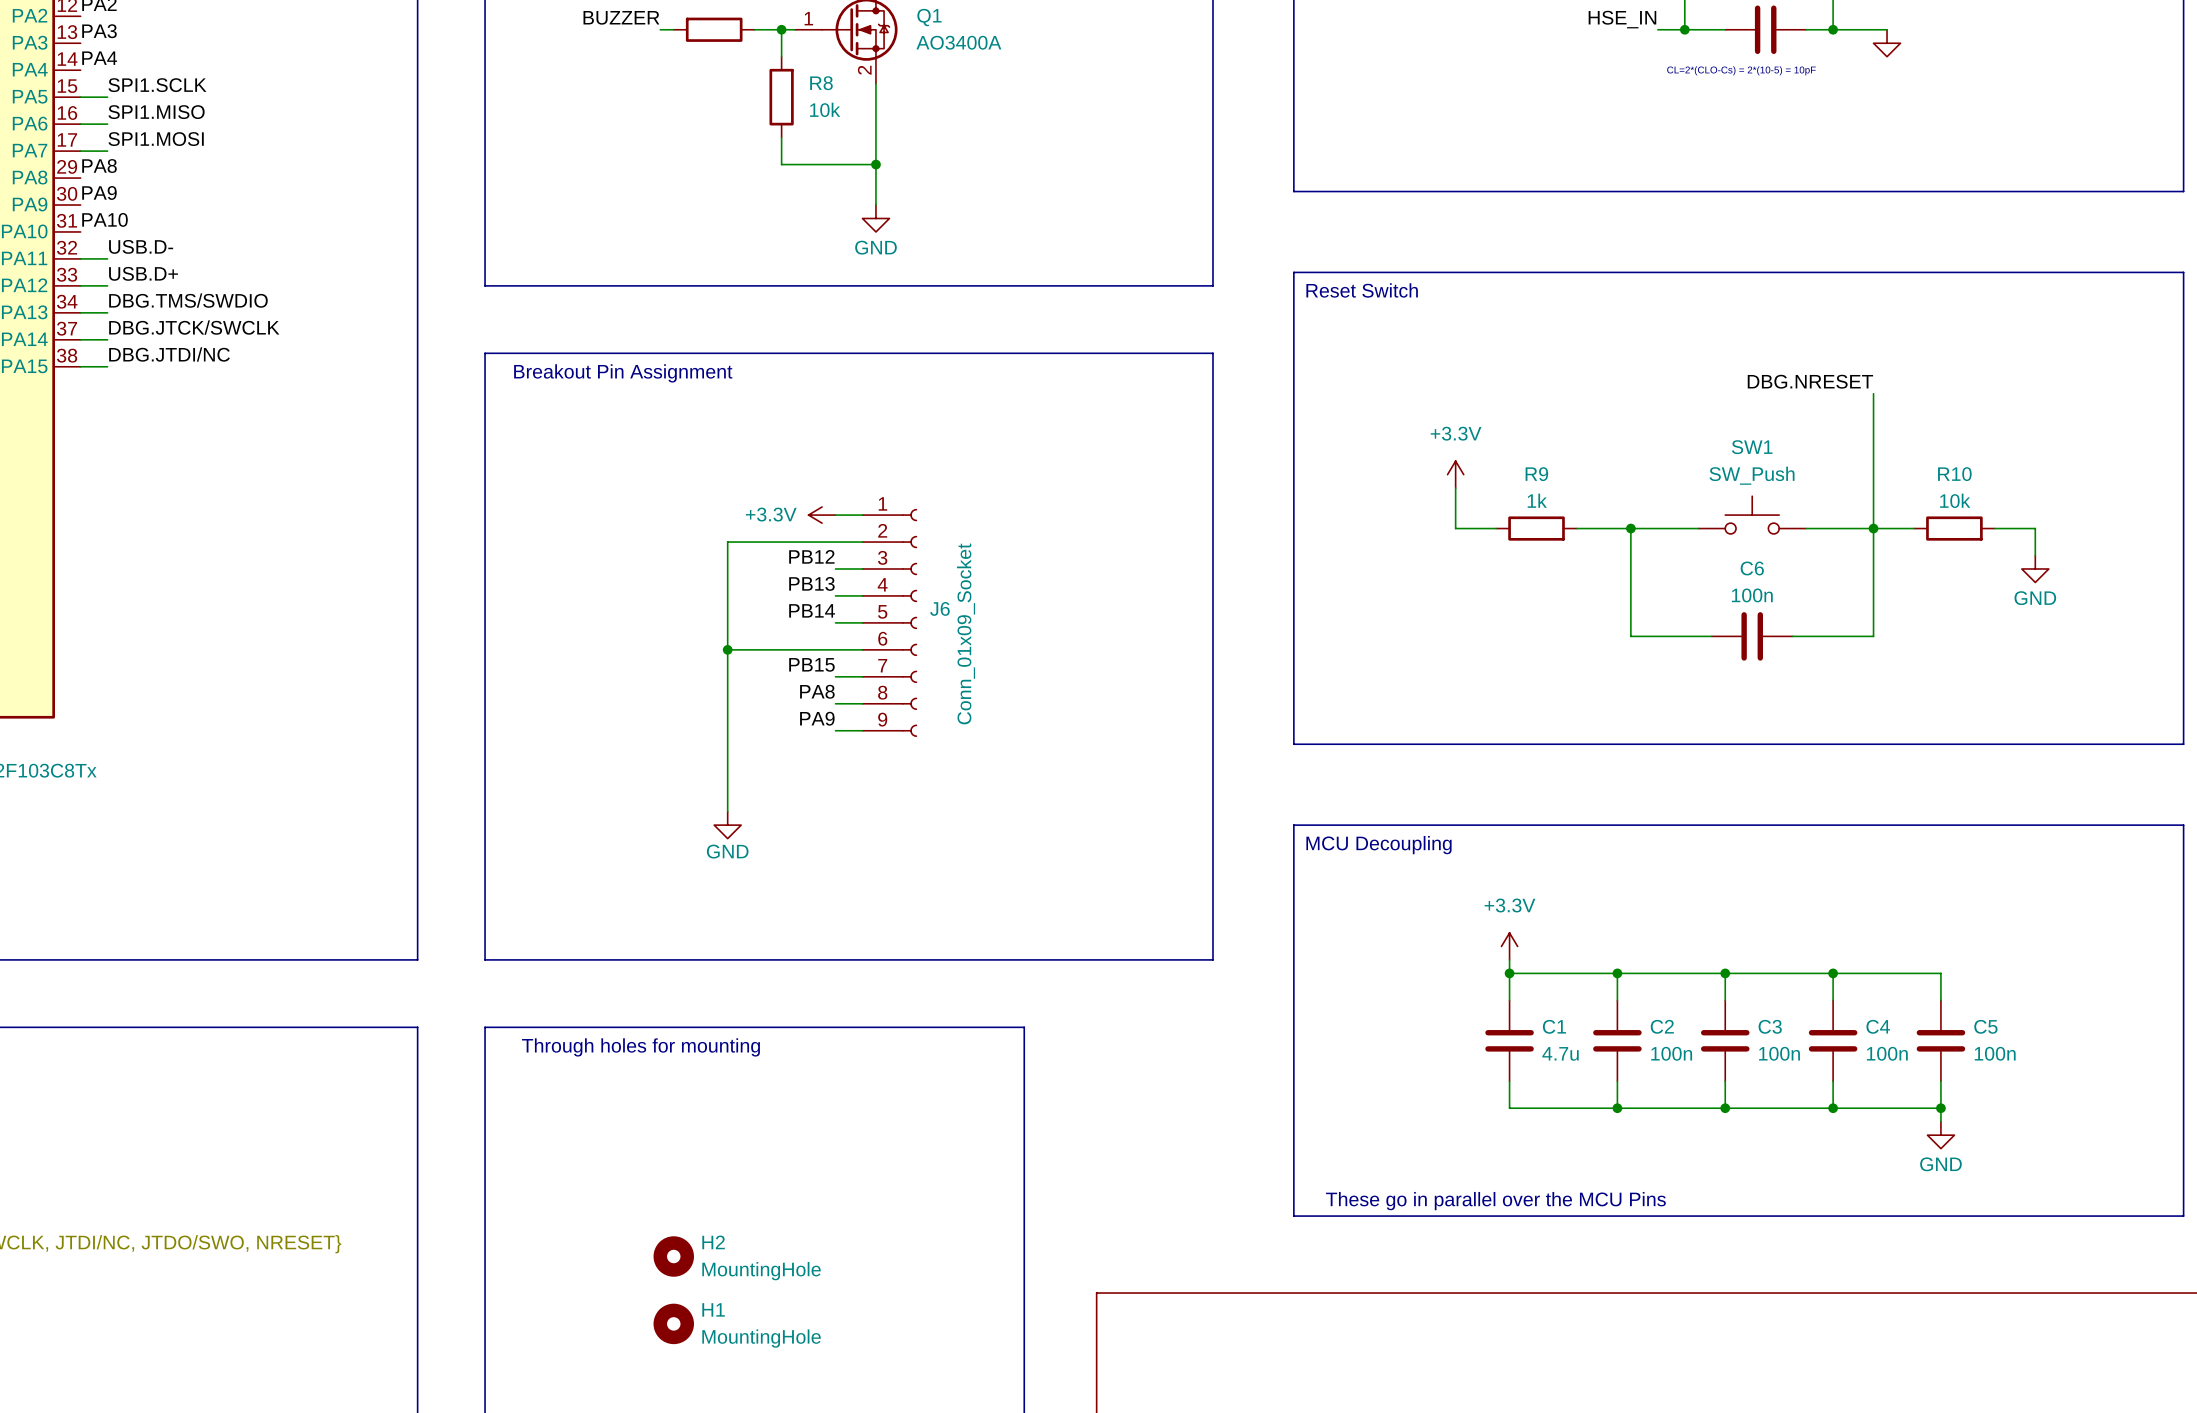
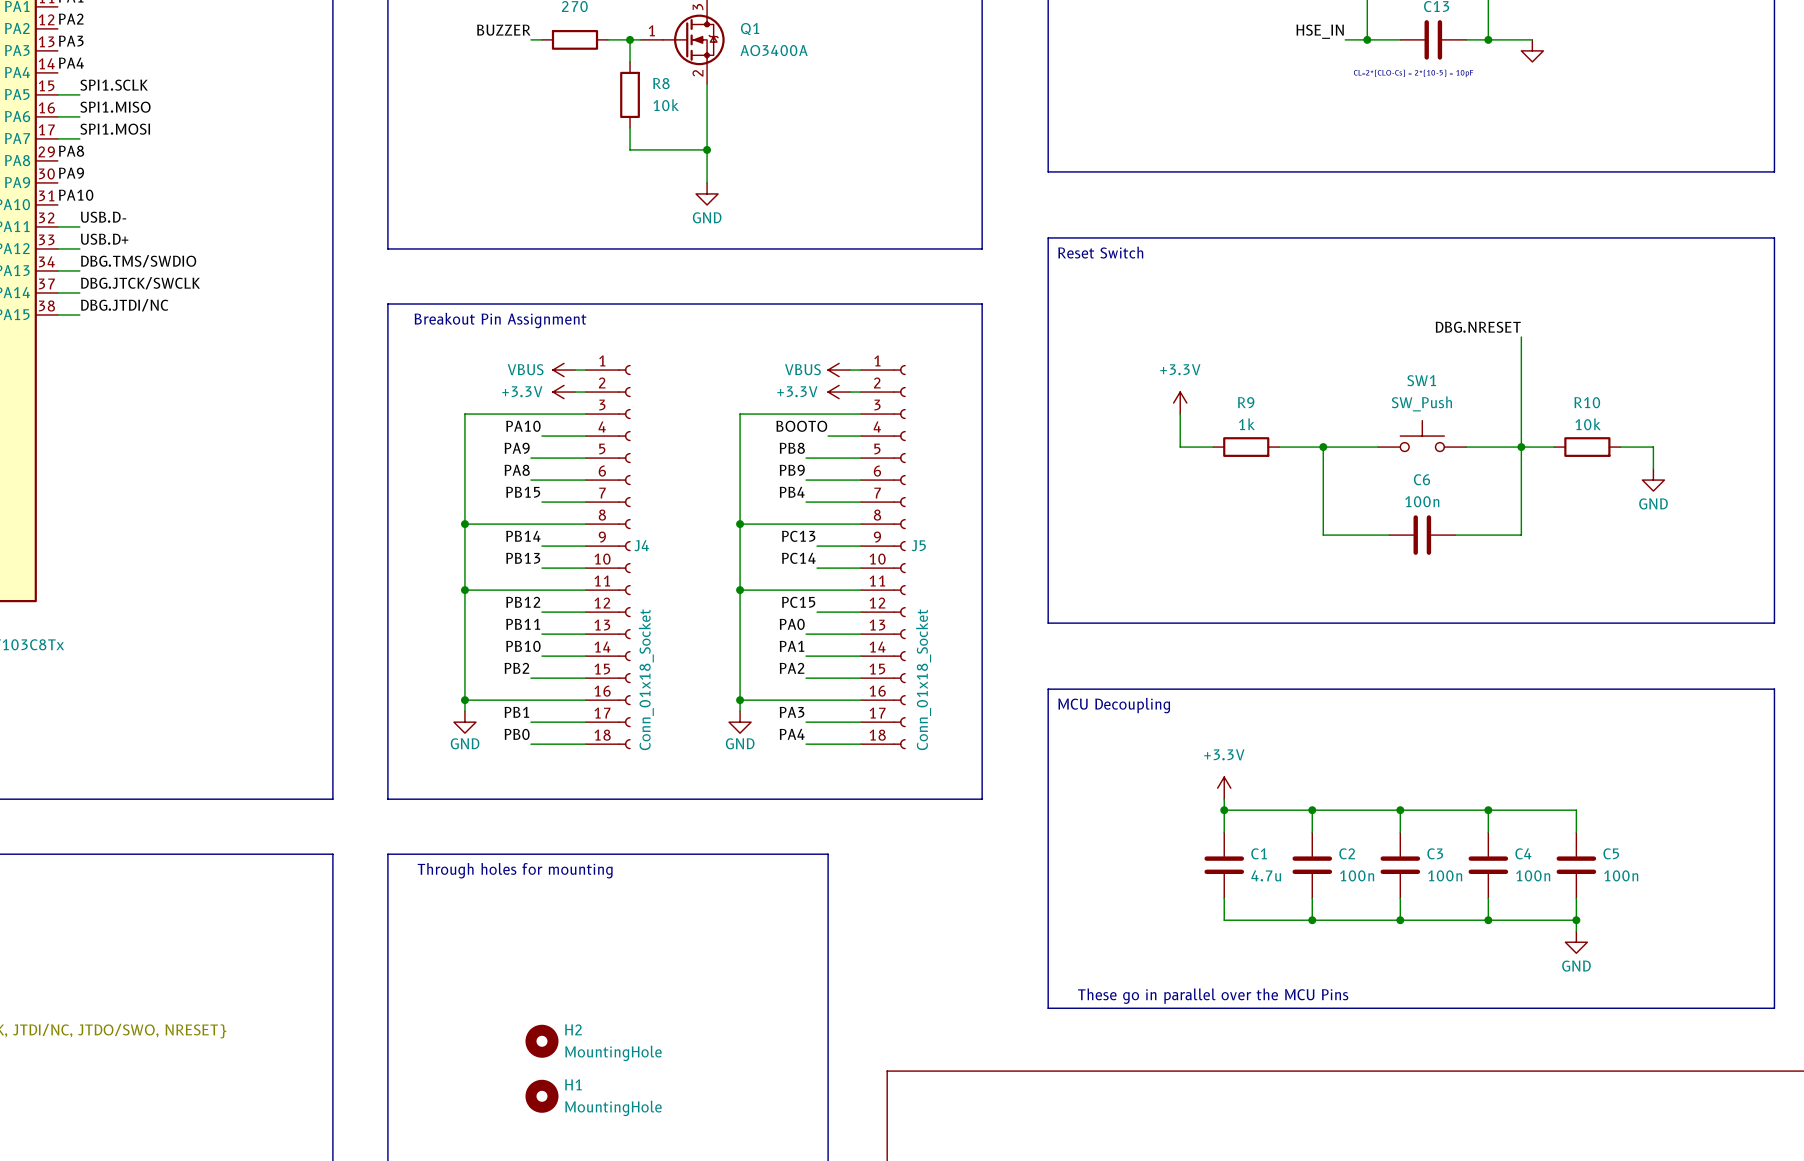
power symbol: none -> VBUS (563, 370)
wire: none -> (575, 370) (586, 370)
power symbol: none -> VBUS (839, 370)
wire: none -> (850, 370) (861, 370)
power symbol: none -> +3.3V (563, 392)
wire: none -> (575, 392) (586, 392)
power symbol: none -> +3.3V (839, 392)
wire: none -> (850, 392) (861, 392)
wire: none -> (586, 414) (464, 414) (464, 711)
wire: none -> (861, 414) (740, 414) (740, 711)
label: none -> PA10 (523, 426)
label: none -> BOOTO (801, 426)
wire: none -> (541, 436) (586, 436)
power symbol: +3.3V (822, 515) -> none
wire: (835, 515) (862, 515) -> none
wire: none -> (828, 436) (861, 436)
label: none -> PB8 (792, 448)
wire: none -> (530, 458) (586, 458)
wire: (862, 542) (727, 542) (727, 811) -> (530, 678) (586, 678)
wire: none -> (806, 458) (861, 458)
label position: PB12 (811, 556) -> PB12 (523, 602)
label: none -> PB9 (792, 470)
wire: none -> (530, 480) (586, 480)
wire: (835, 568) (862, 568) -> none
wire: none -> (806, 480) (861, 480)
label position: PB13 (811, 583) -> PB13 (523, 558)
label: none -> PB4 (792, 492)
wire: none -> (541, 502) (586, 502)
wire: (835, 595) (862, 595) -> none
wire: none -> (806, 502) (861, 502)
label position: PB14 (812, 610) -> PB14 (523, 536)
wire: none -> (464, 524) (586, 524)
junction: none -> (464, 524)
wire: (835, 622) (862, 622) -> none
J6: Conn_01x09_Socket (889, 622) -> none
wire: none -> (740, 524) (861, 524)
junction: none -> (740, 524)
label: none -> PC13 (798, 536)
wire: (727, 649) (862, 649) -> (586, 546) (541, 546)
junction: (727, 649) -> none
wire: none -> (817, 546) (861, 546)
J4: none -> Conn_01x18_Socket (608, 557)
J5: none -> Conn_01x18_Socket (883, 557)
label position: PB15 (811, 664) -> PB15 (523, 492)
label: none -> PC14 (798, 558)
wire: none -> (541, 568) (586, 568)
wire: (835, 676) (862, 676) -> none
wire: none -> (817, 568) (861, 568)
label position: PA8 (817, 691) -> PA8 (517, 470)
wire: none -> (464, 590) (586, 590)
junction: none -> (464, 590)
wire: (835, 703) (862, 703) -> none
wire: none -> (740, 590) (861, 590)
junction: none -> (740, 590)
label position: PA9 (817, 718) -> PA9 (517, 448)
label: none -> PC15 (798, 602)
wire: none -> (541, 612) (586, 612)
wire: (835, 730) (862, 730) -> none
wire: none -> (817, 612) (861, 612)
label: none -> PB11 (523, 624)
label: none -> PA0 (792, 624)
wire: none -> (541, 634) (586, 634)
wire: none -> (806, 634) (861, 634)
label: none -> PB10 (523, 646)
label: none -> PA1 (791, 646)
wire: none -> (541, 656) (586, 656)
wire: none -> (806, 656) (861, 656)
label: none -> PB2 (516, 668)
label: none -> PA2 (792, 668)
wire: none -> (806, 678) (861, 678)
power symbol: GND (727, 825) -> none
wire: none -> (464, 700) (586, 700)
junction: none -> (464, 700)
wire: none -> (740, 700) (861, 700)
junction: none -> (740, 700)
label: none -> PB1 (516, 712)
label: none -> PA3 (792, 712)
power symbol: none -> GND (464, 722)
wire: none -> (530, 722) (586, 722)
power symbol: none -> GND (740, 722)
wire: none -> (806, 722) (861, 722)
label: none -> PB0 (517, 734)
label: none -> PA4 (792, 734)
wire: none -> (530, 744) (586, 744)
wire: none -> (806, 744) (861, 744)

